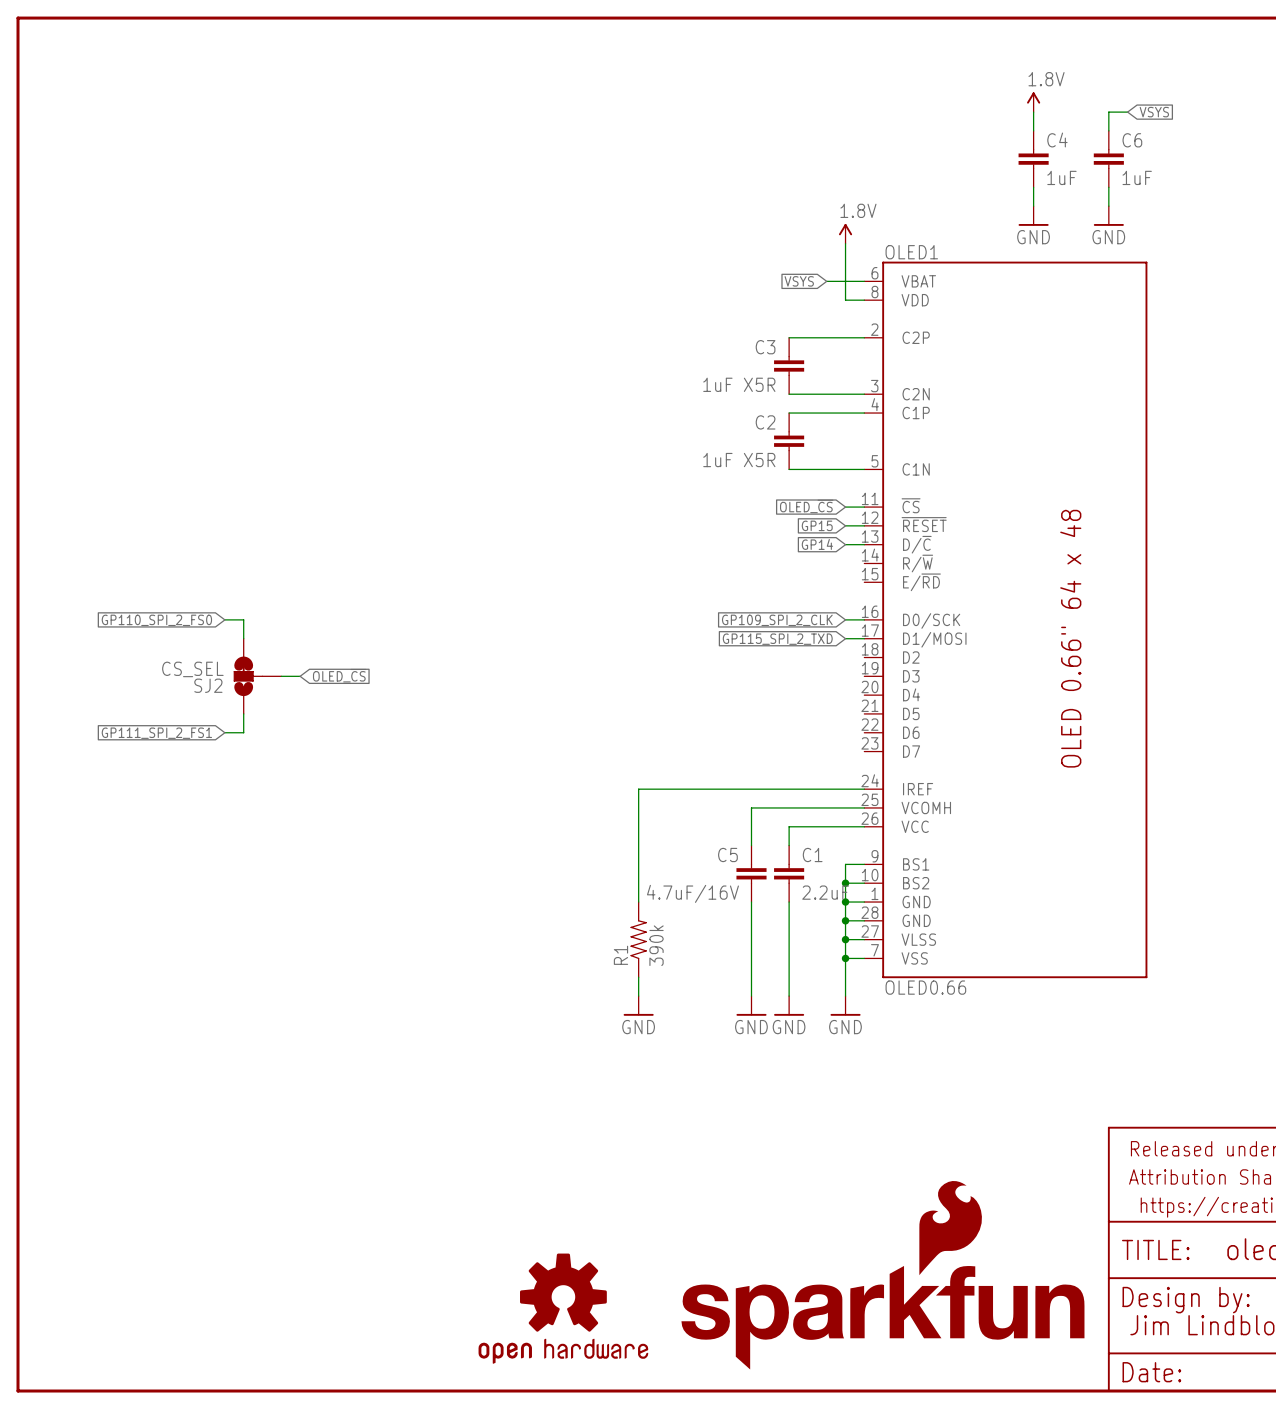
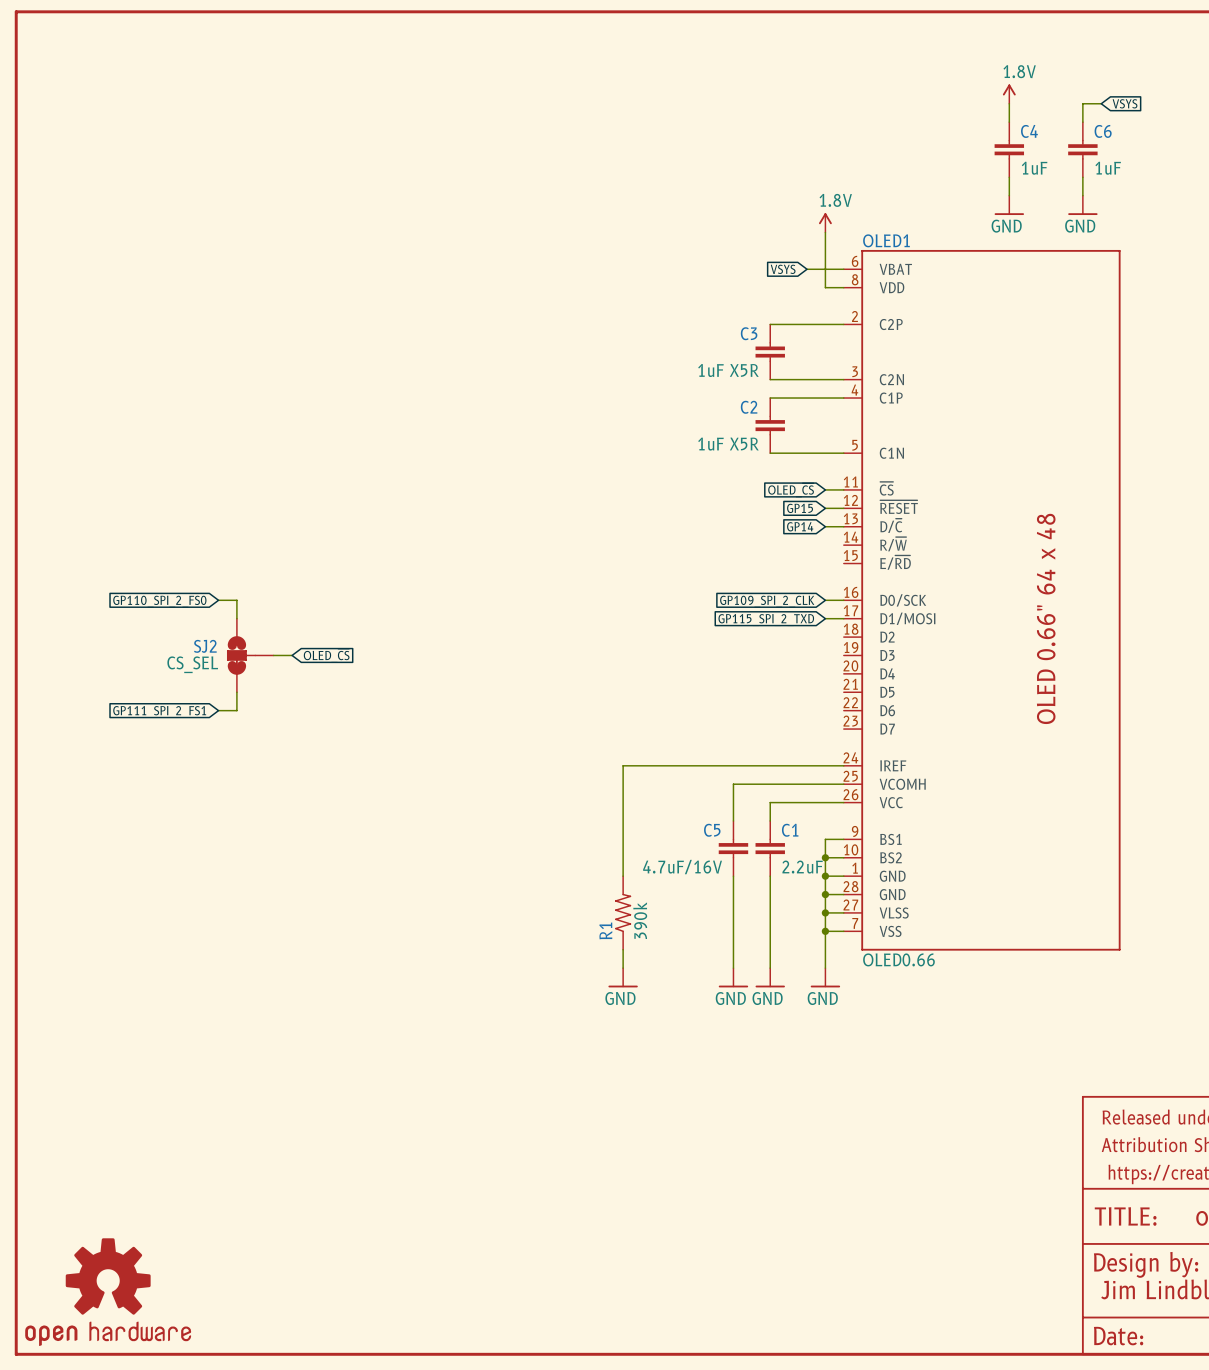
SJ2 flip: as is (248, 676) -> up-down (241, 655)
part: (882, 1275) -> none
part: (563, 1308) -> none
part: none -> (108, 1292)

